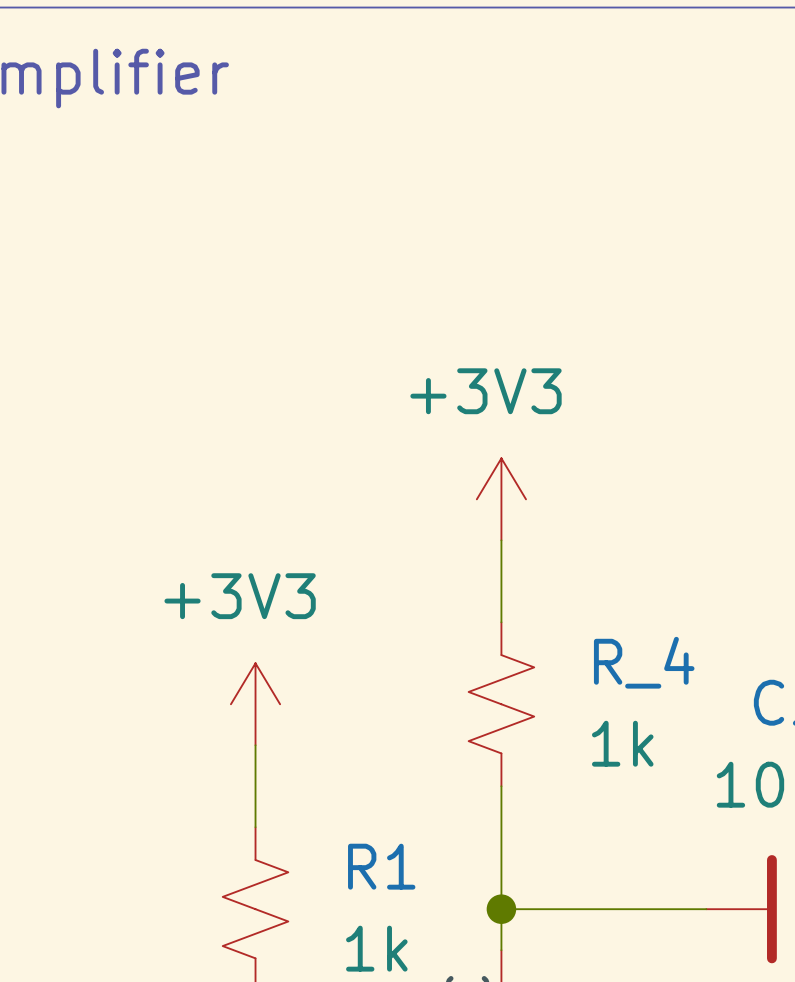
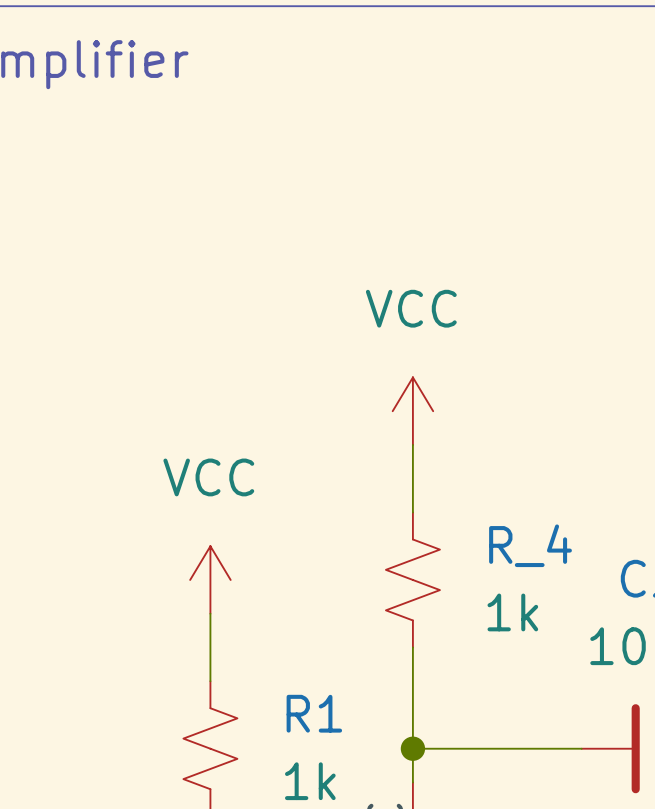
power symbol: +3V3 (501, 499) -> VCC (412, 411)
power symbol: +3V3 (255, 704) -> VCC (210, 579)

